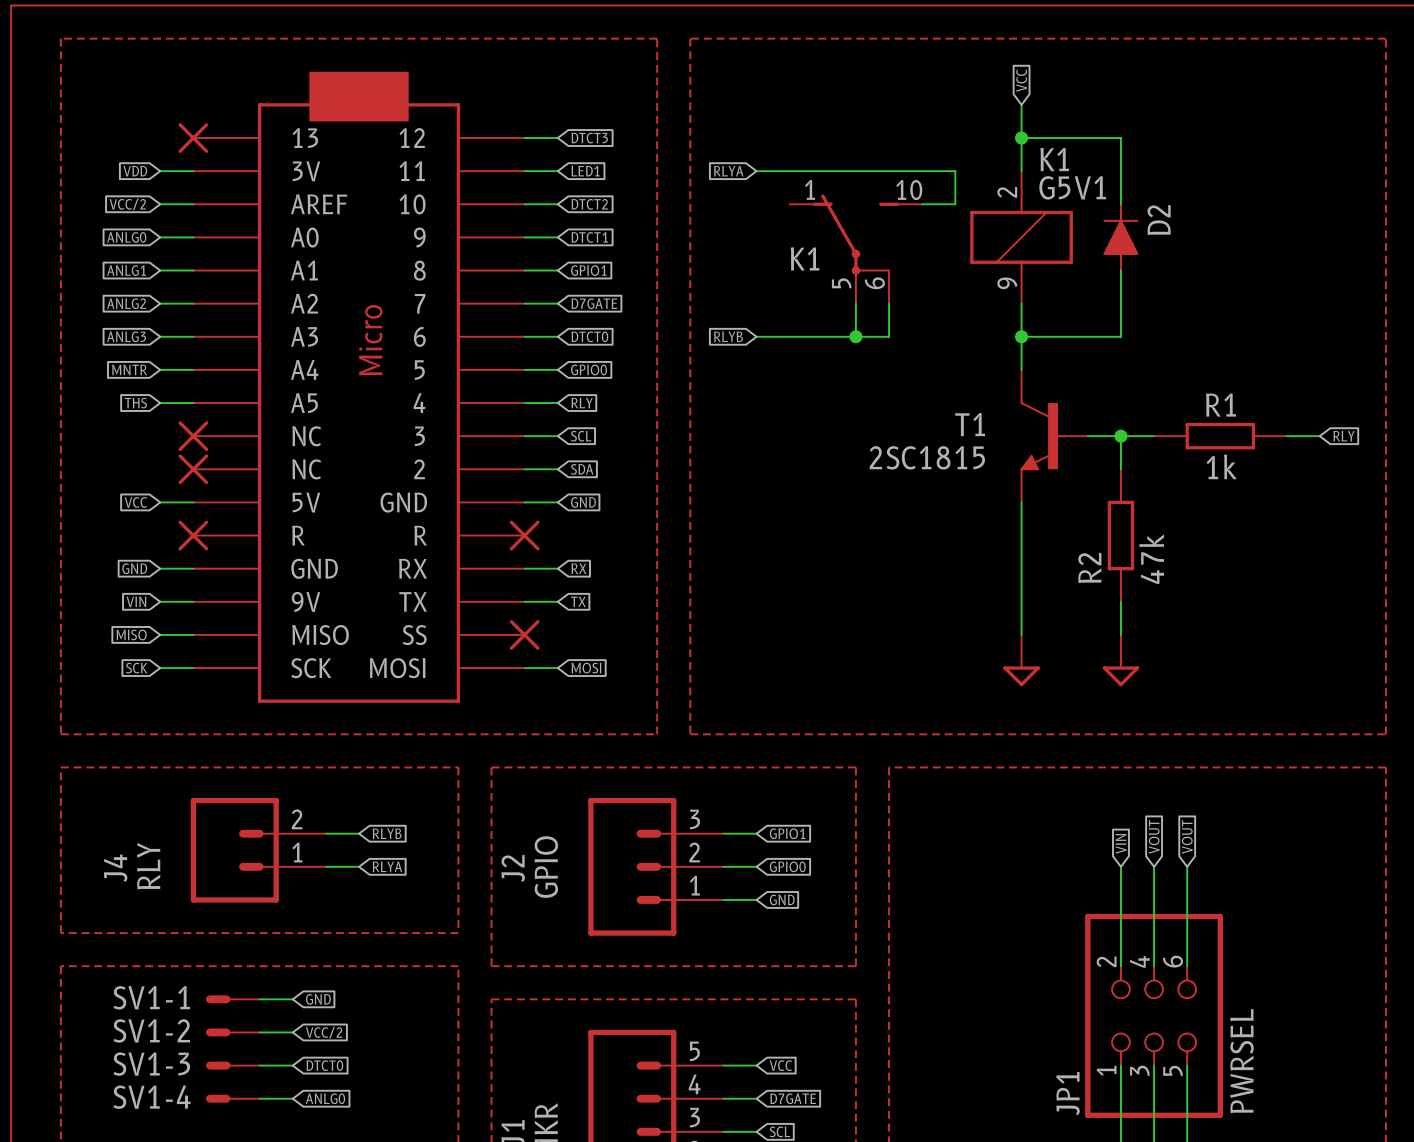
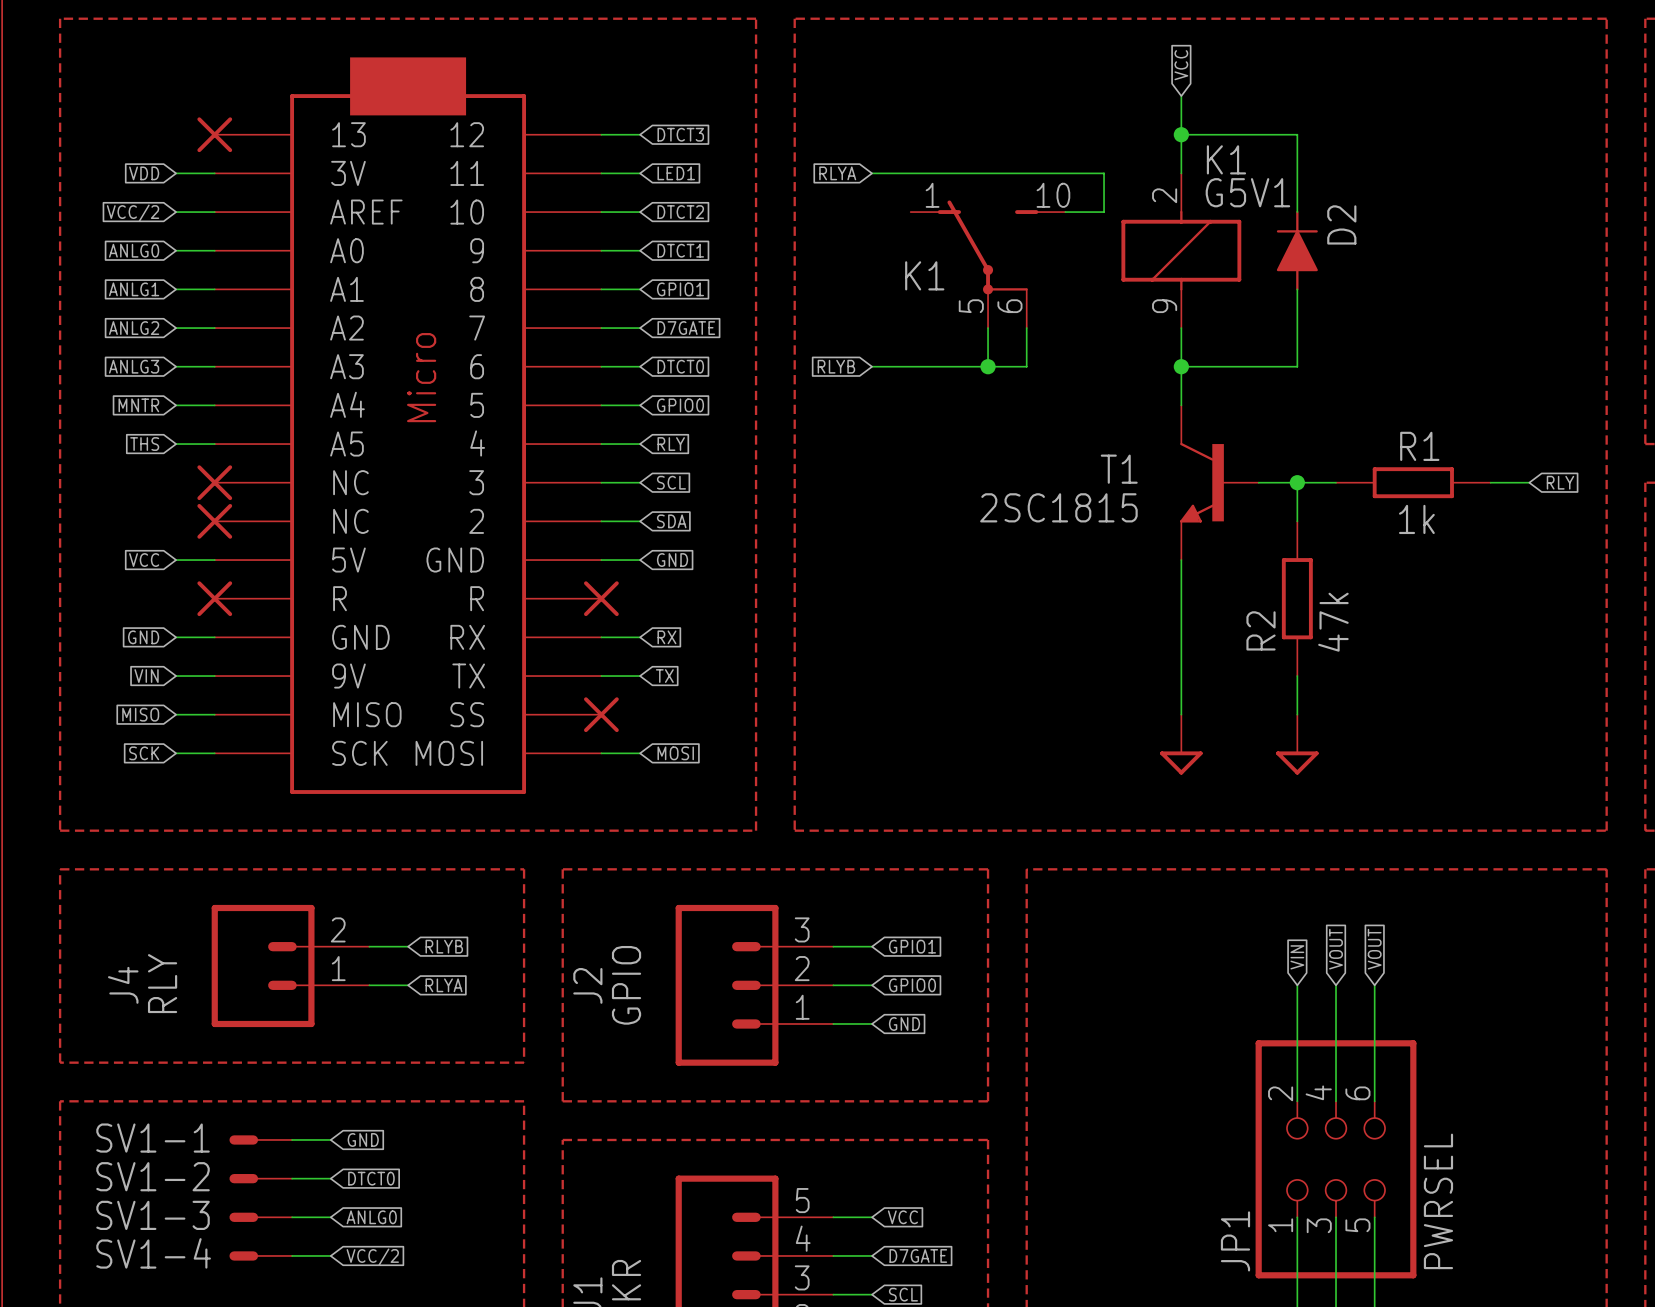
global label: VCC/2 (324, 1032) -> DTCT0 (371, 1178)
global label: DTCT0 (324, 1065) -> ANLG0 (371, 1217)
global label: ANLG0 (325, 1098) -> VCC/2 (372, 1257)

